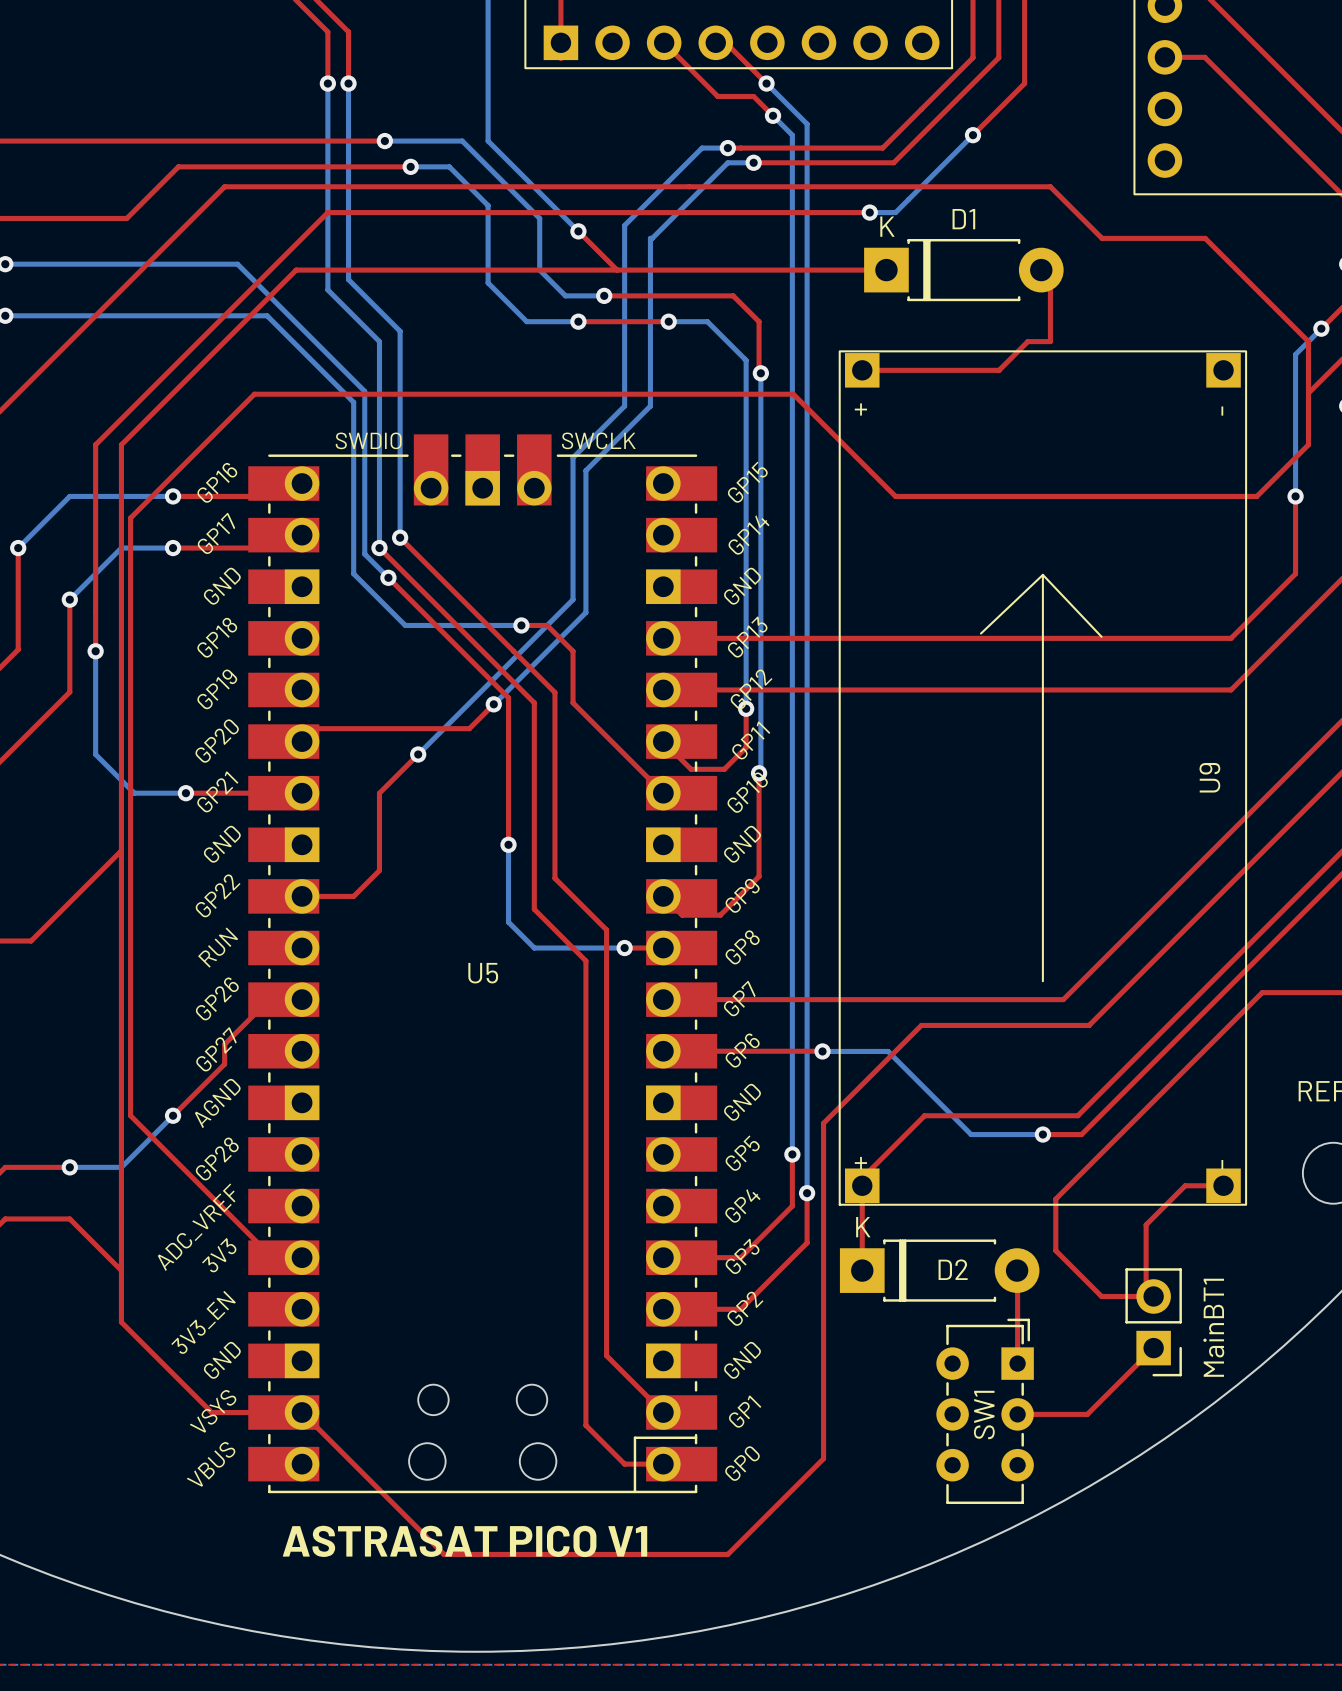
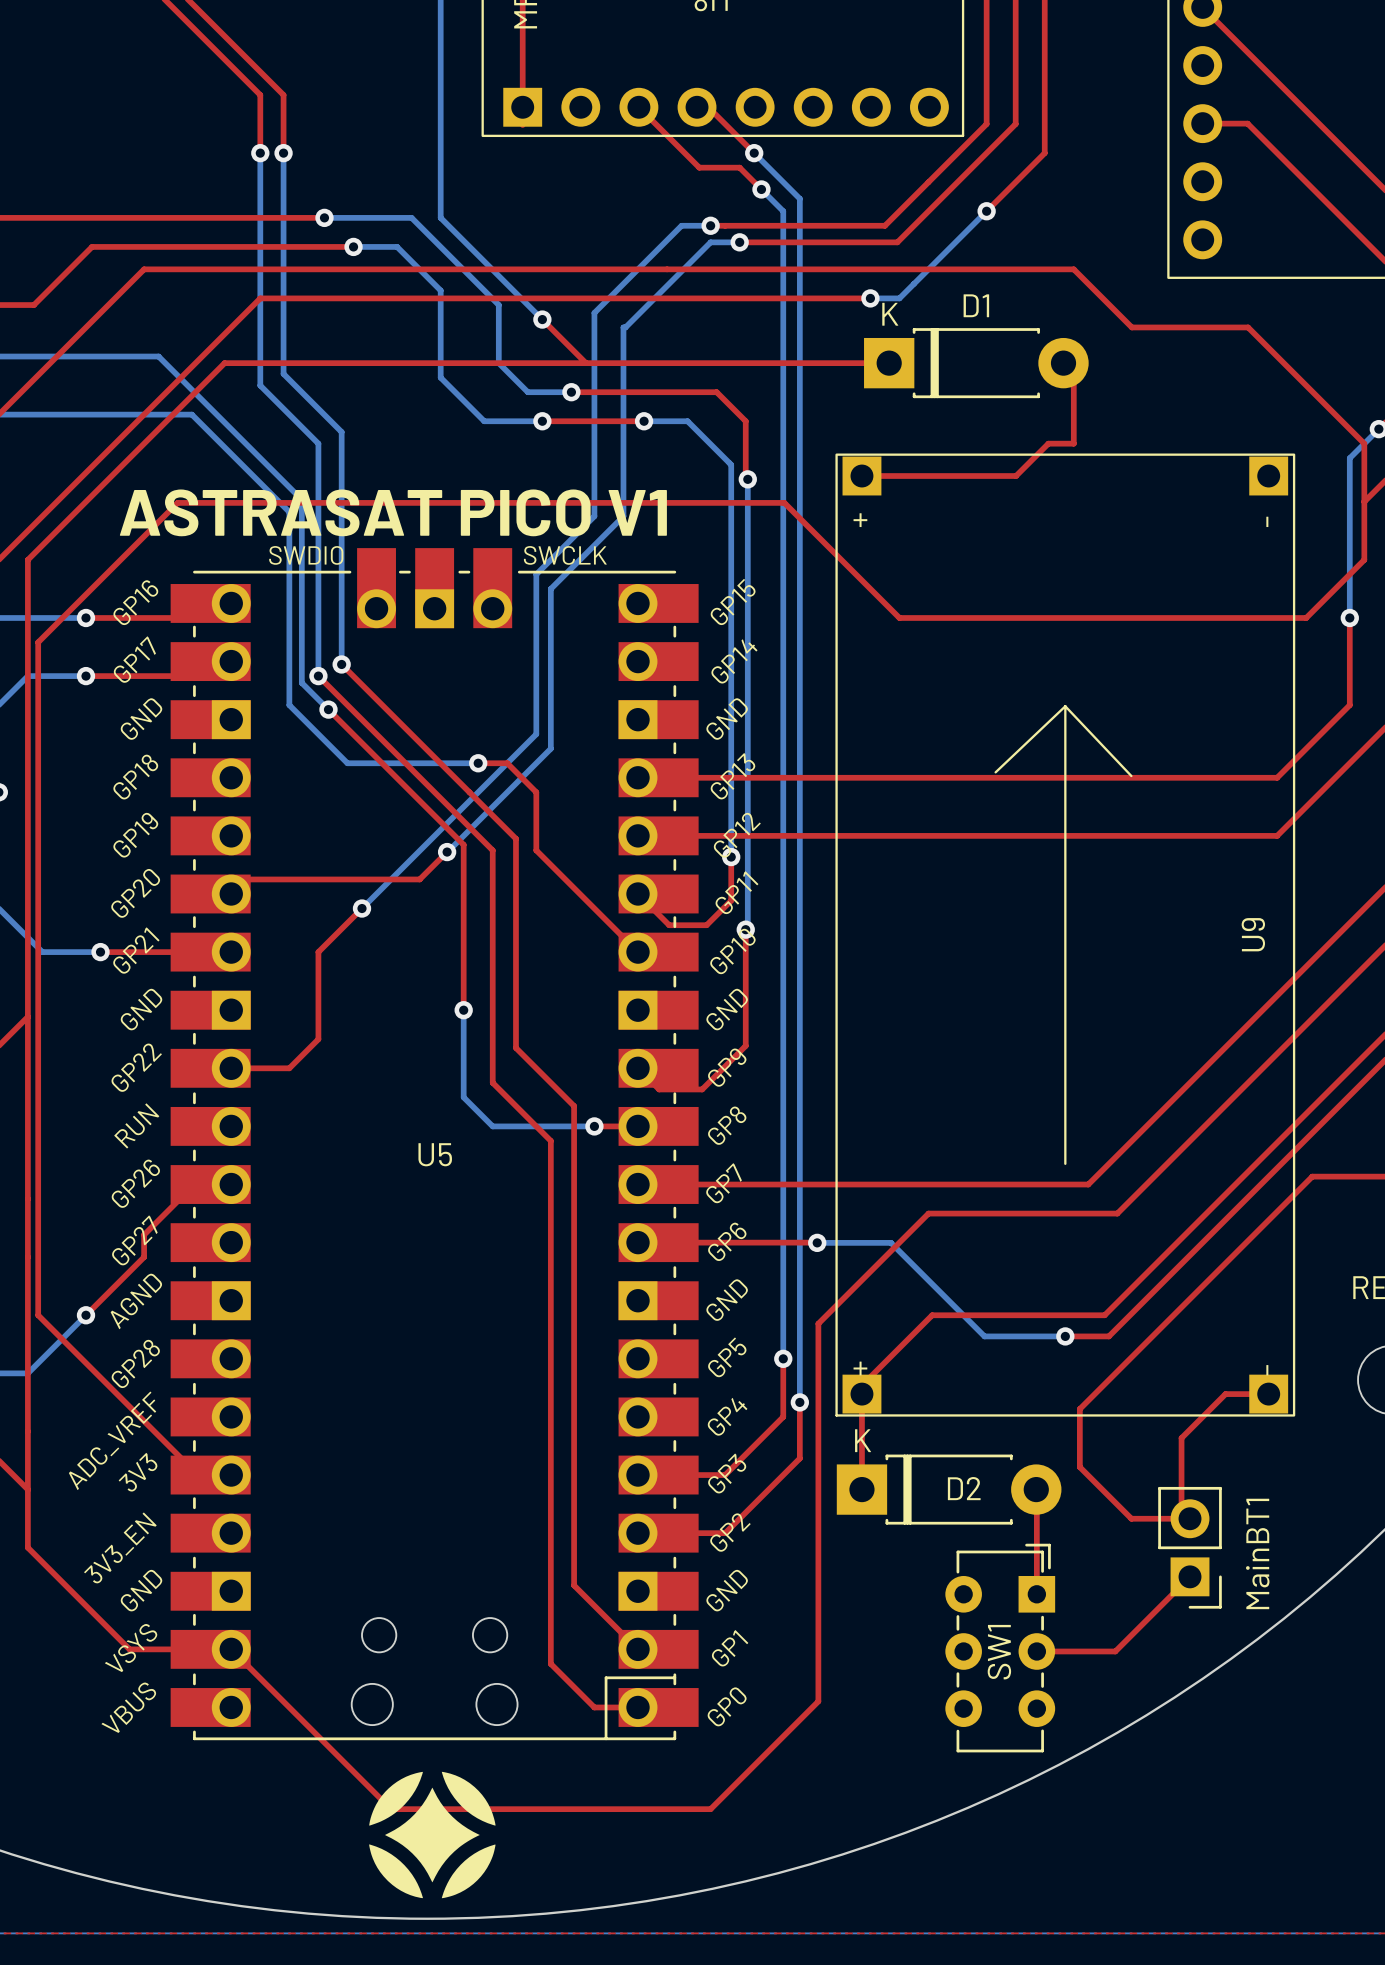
text: none -> ASTRASAT PICO V1 (393, 512)
drawing: none -> [369, 1771, 496, 1899]
text: ASTRASAT PICO V1 (465, 1541) -> none

